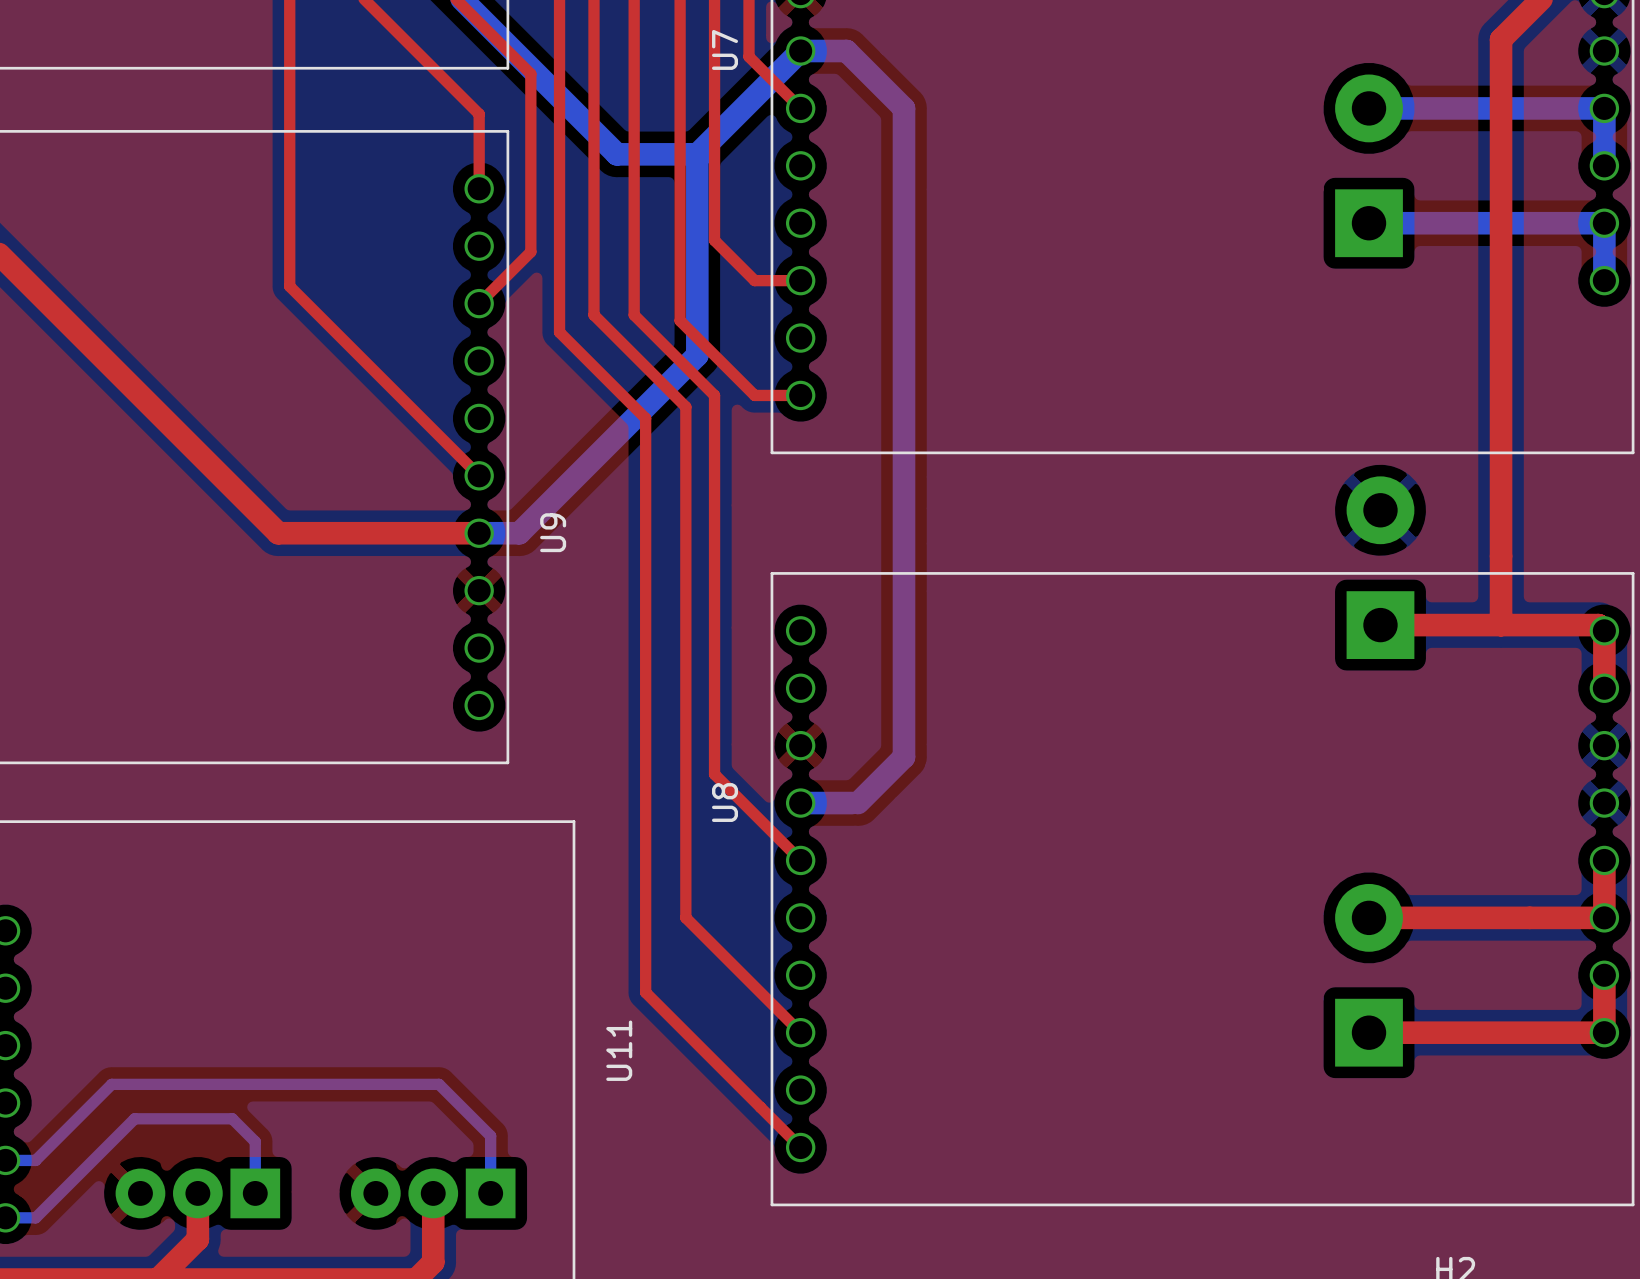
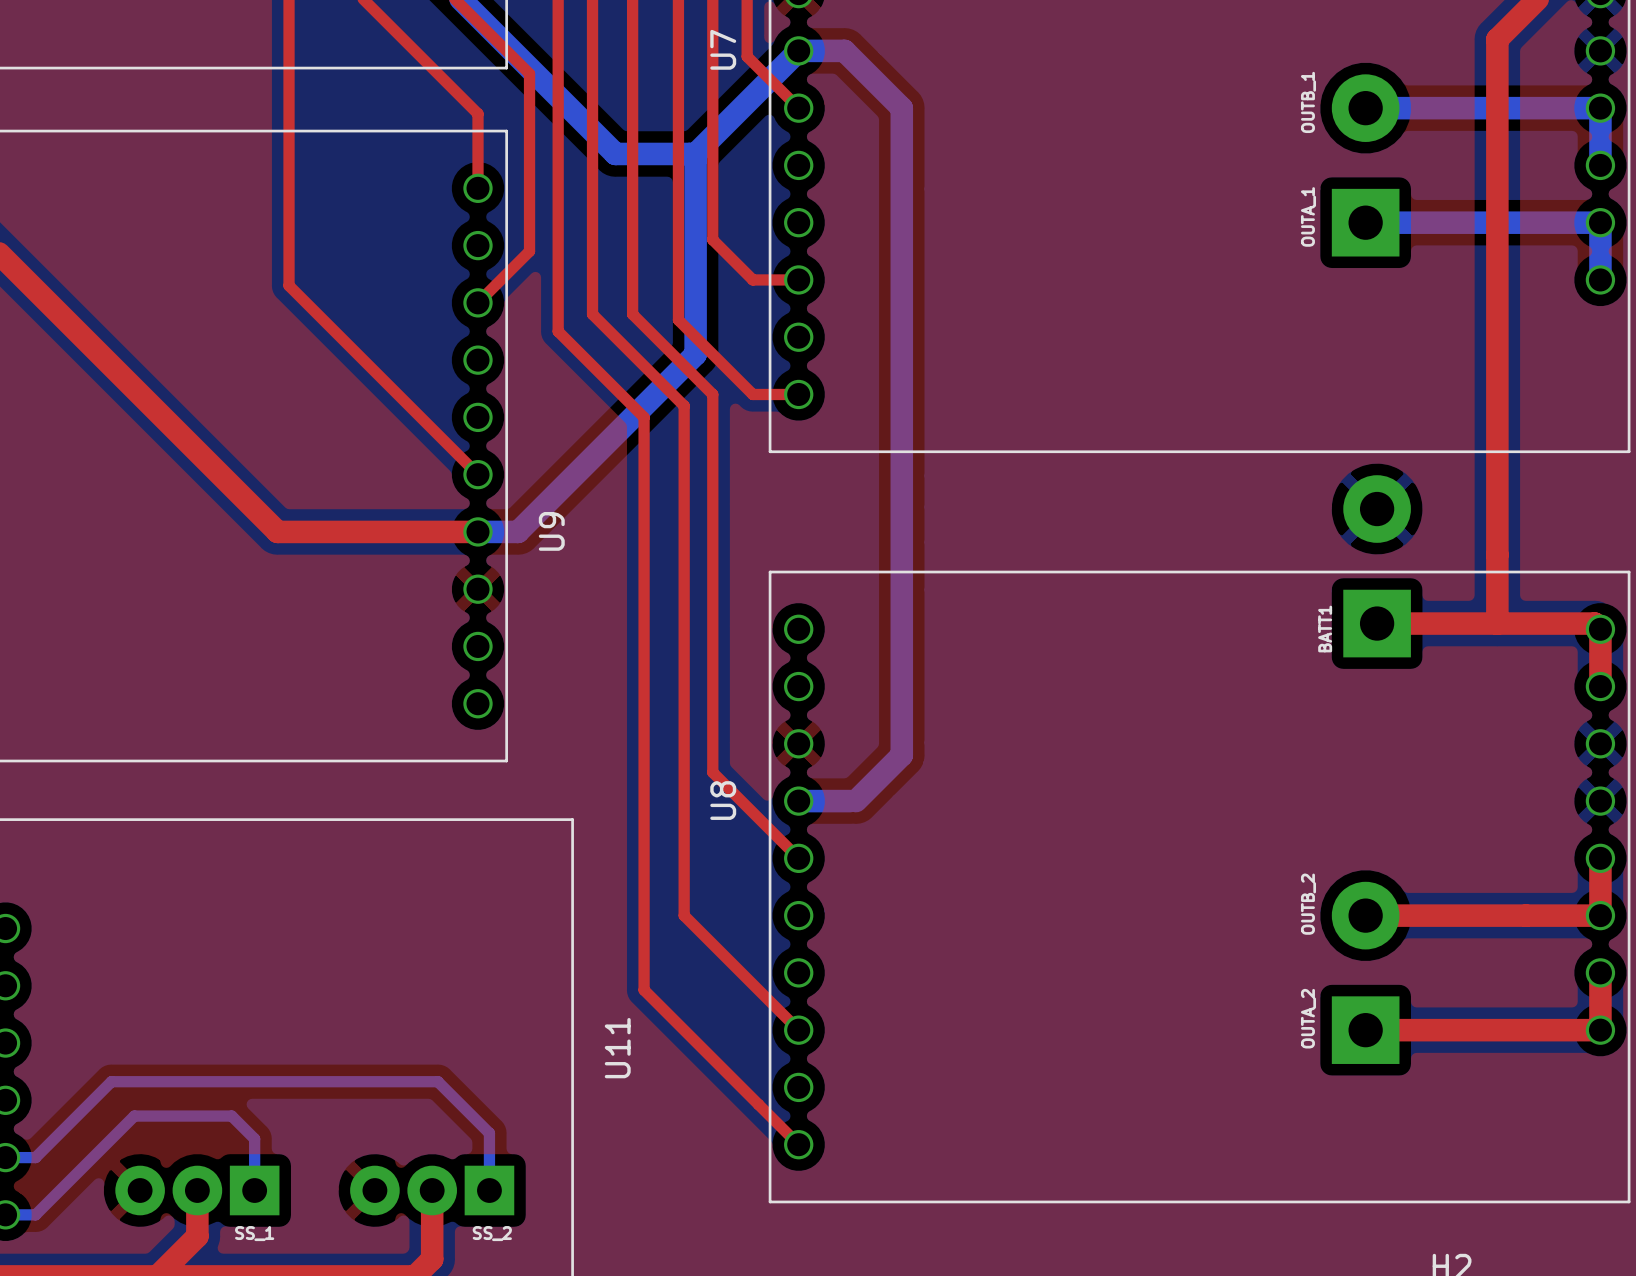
text: none -> OUTB_1 (1308, 102)
text: none -> OUTA_1 (1308, 216)
text: none -> BATT1 (1325, 629)
text: none -> OUTB_2 (1308, 904)
text: none -> OUTA_2 (1308, 1018)
text: none -> SS_1 (254, 1233)
text: none -> SS_2 (492, 1233)

